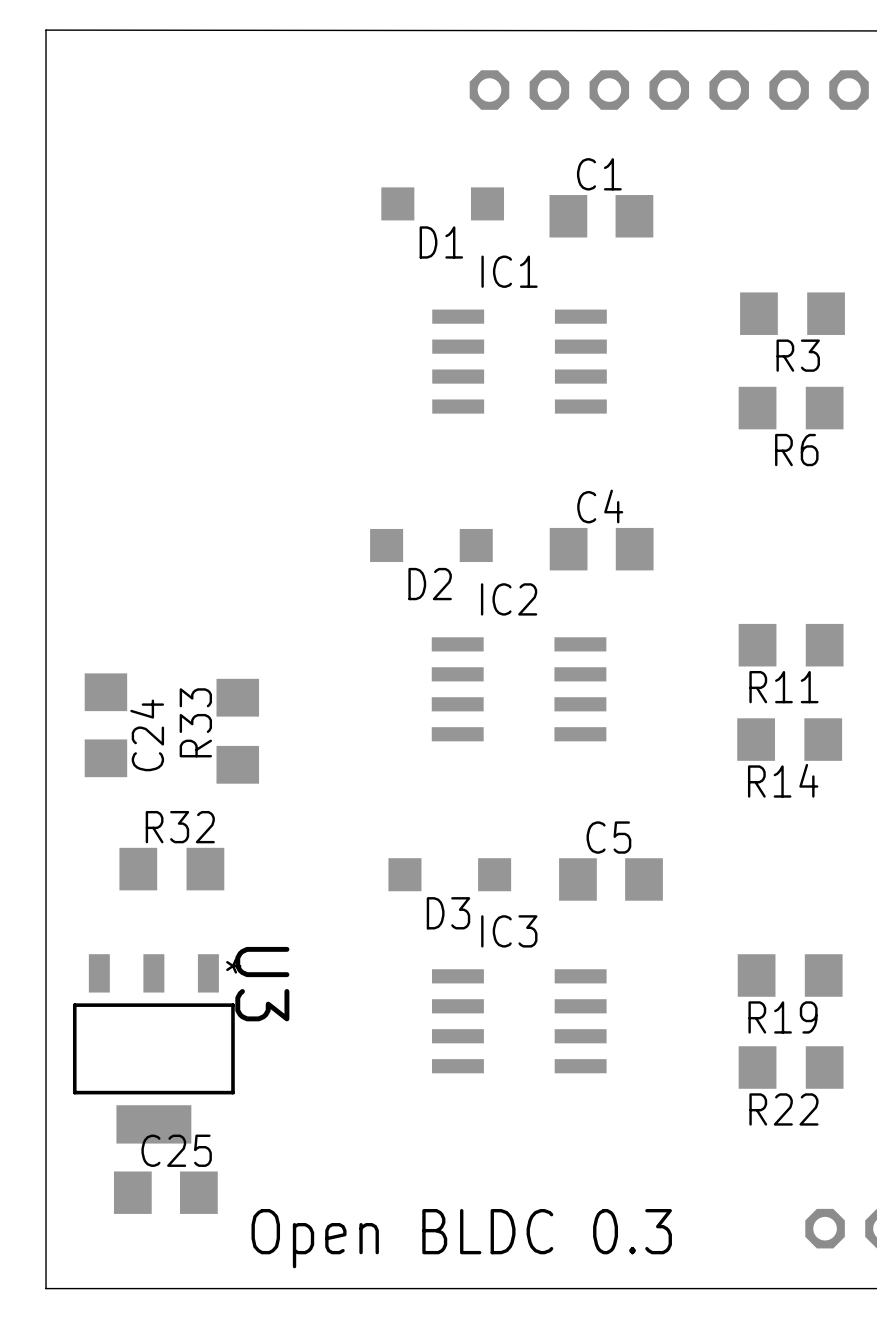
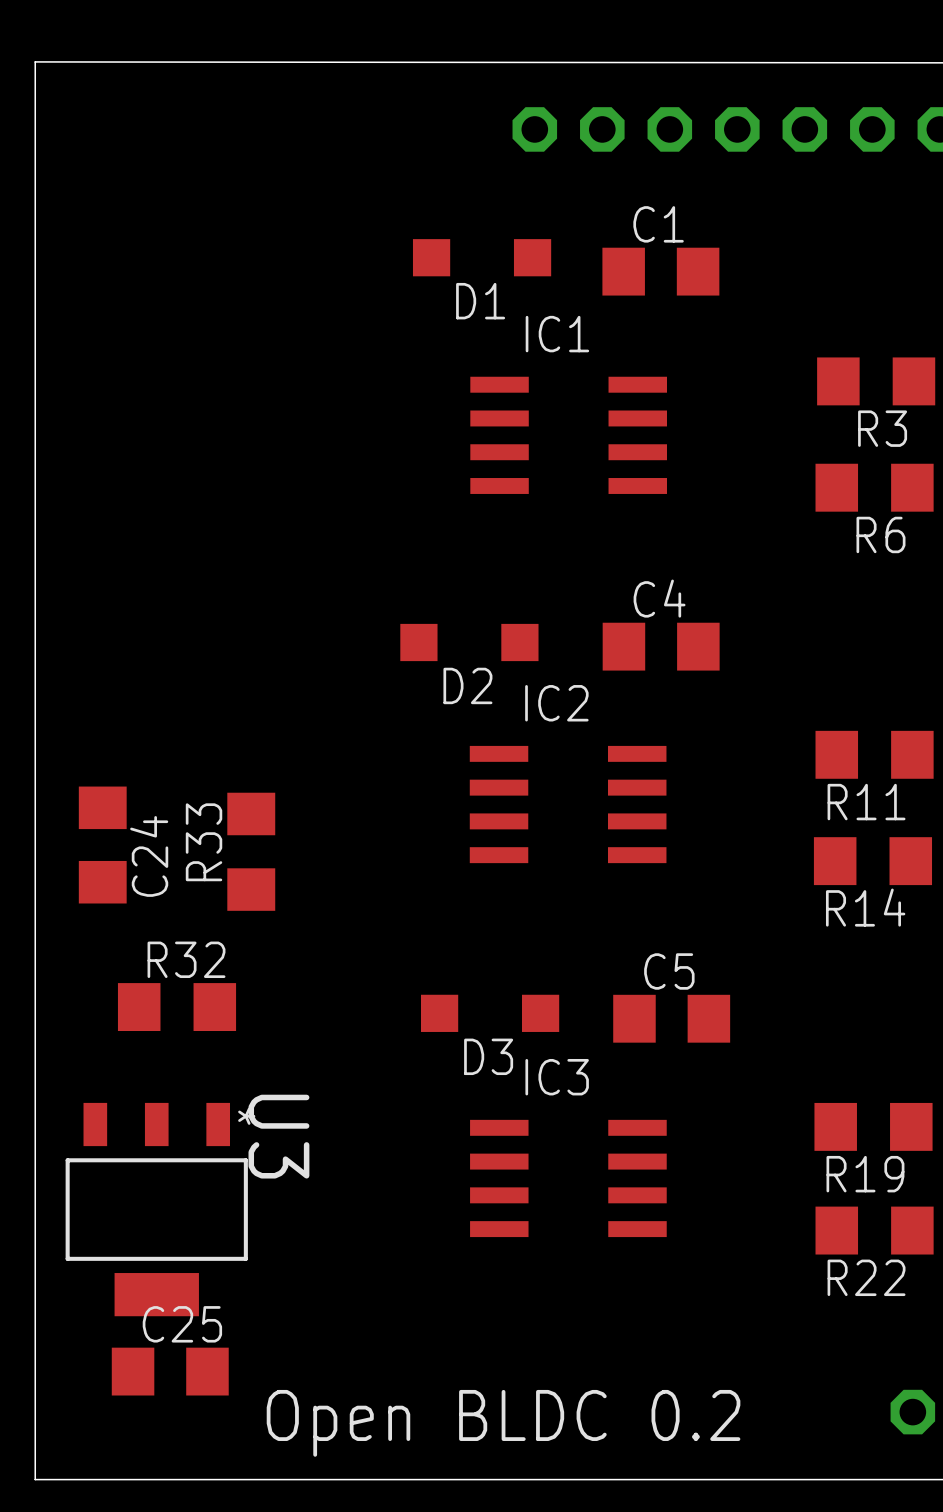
text: Open BLDC 0.3 (461, 1238) -> Open BLDC 0.2 (503, 1423)

